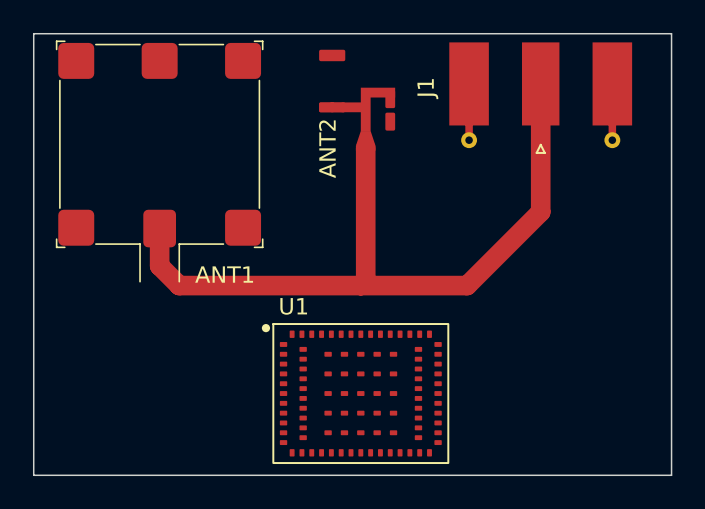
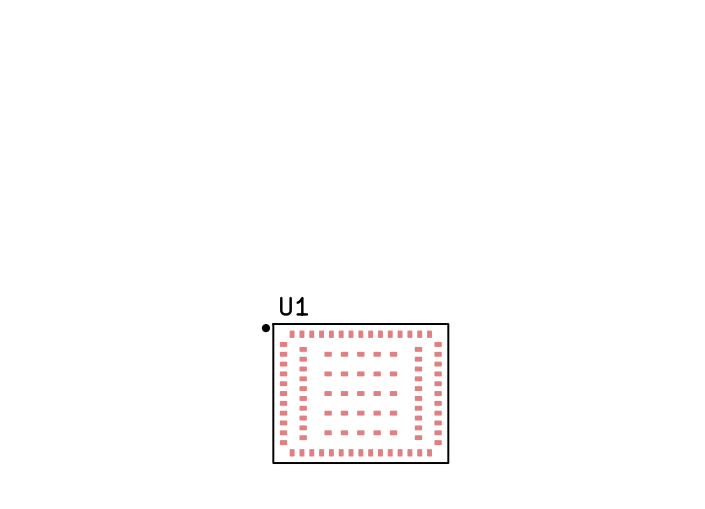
board edge: (33, 33) (671, 33) (671, 475) (33, 475) (33, 33) -> none
track: (540, 83) (540, 211) (467, 285) (179, 285) (159, 265) (159, 228) -> none
J1: (540, 98) -> none
ANT2: (357, 100) -> none
track: (365, 148) (365, 280) (360, 285) -> none
ANT1: (159, 161) -> none

